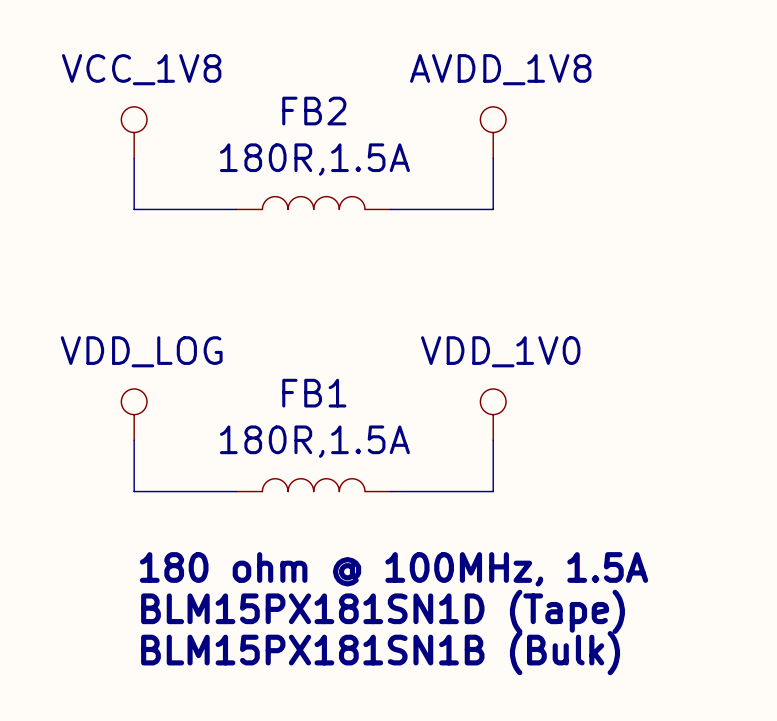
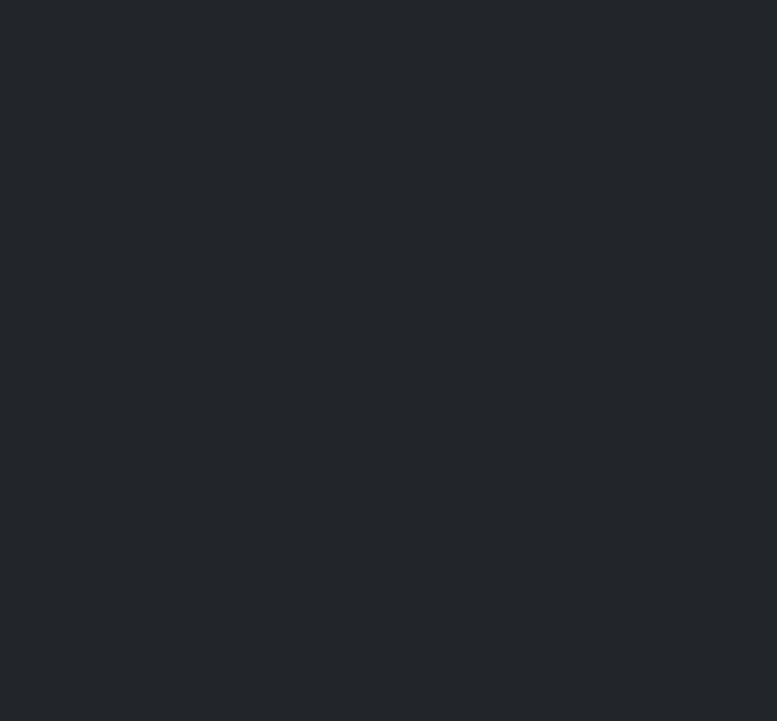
power symbol: VCC_1V8 (134, 132) -> none
power symbol: AVDD_1V8 (493, 132) -> none
wire: (134, 158) (134, 209) (236, 209) -> none
wire: (493, 158) (493, 209) (390, 209) -> none
FB2: 180R,1.5A (313, 203) -> none
power symbol: VDD_LOG (134, 414) -> none
power symbol: VDD_1V0 (493, 414) -> none
wire: (134, 440) (134, 491) (236, 491) -> none
wire: (493, 440) (493, 491) (390, 491) -> none
FB1: 180R,1.5A (313, 485) -> none
text: 180 ohm @ 100MHz, 1.5A (394, 569) -> none
text: BLM15PX181SN1D (Tape) (383, 611) -> none
text: BLM15PX181SN1B (Bulk) (380, 653) -> none

